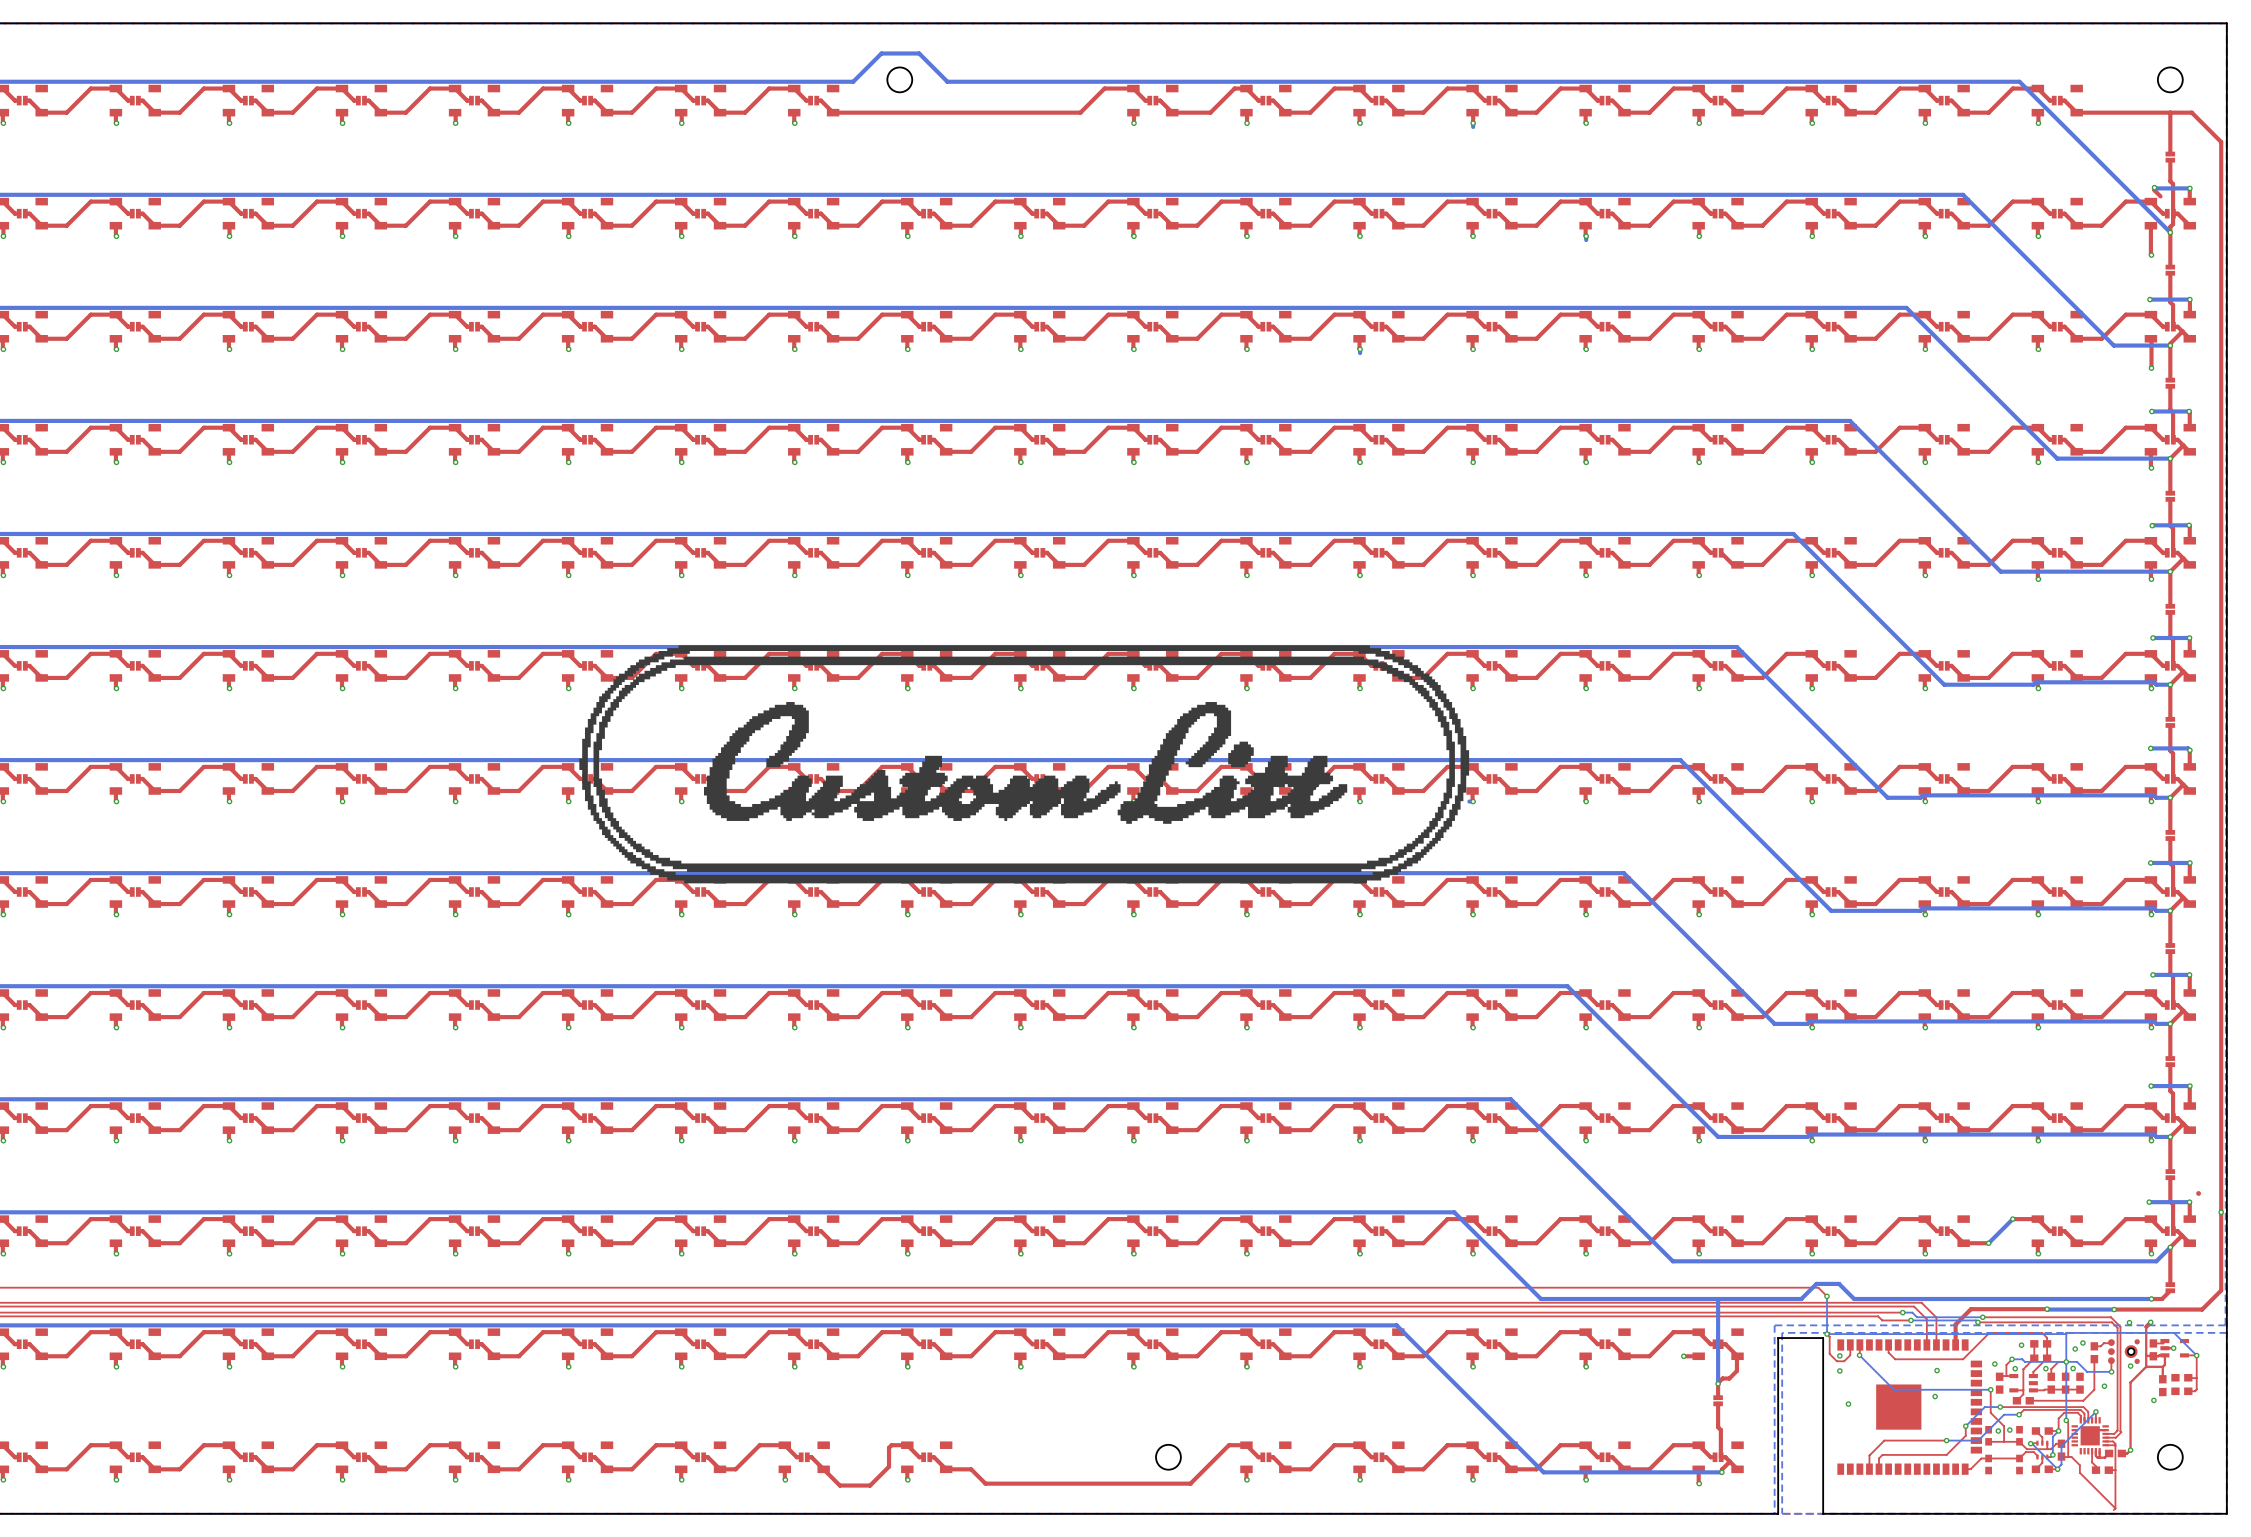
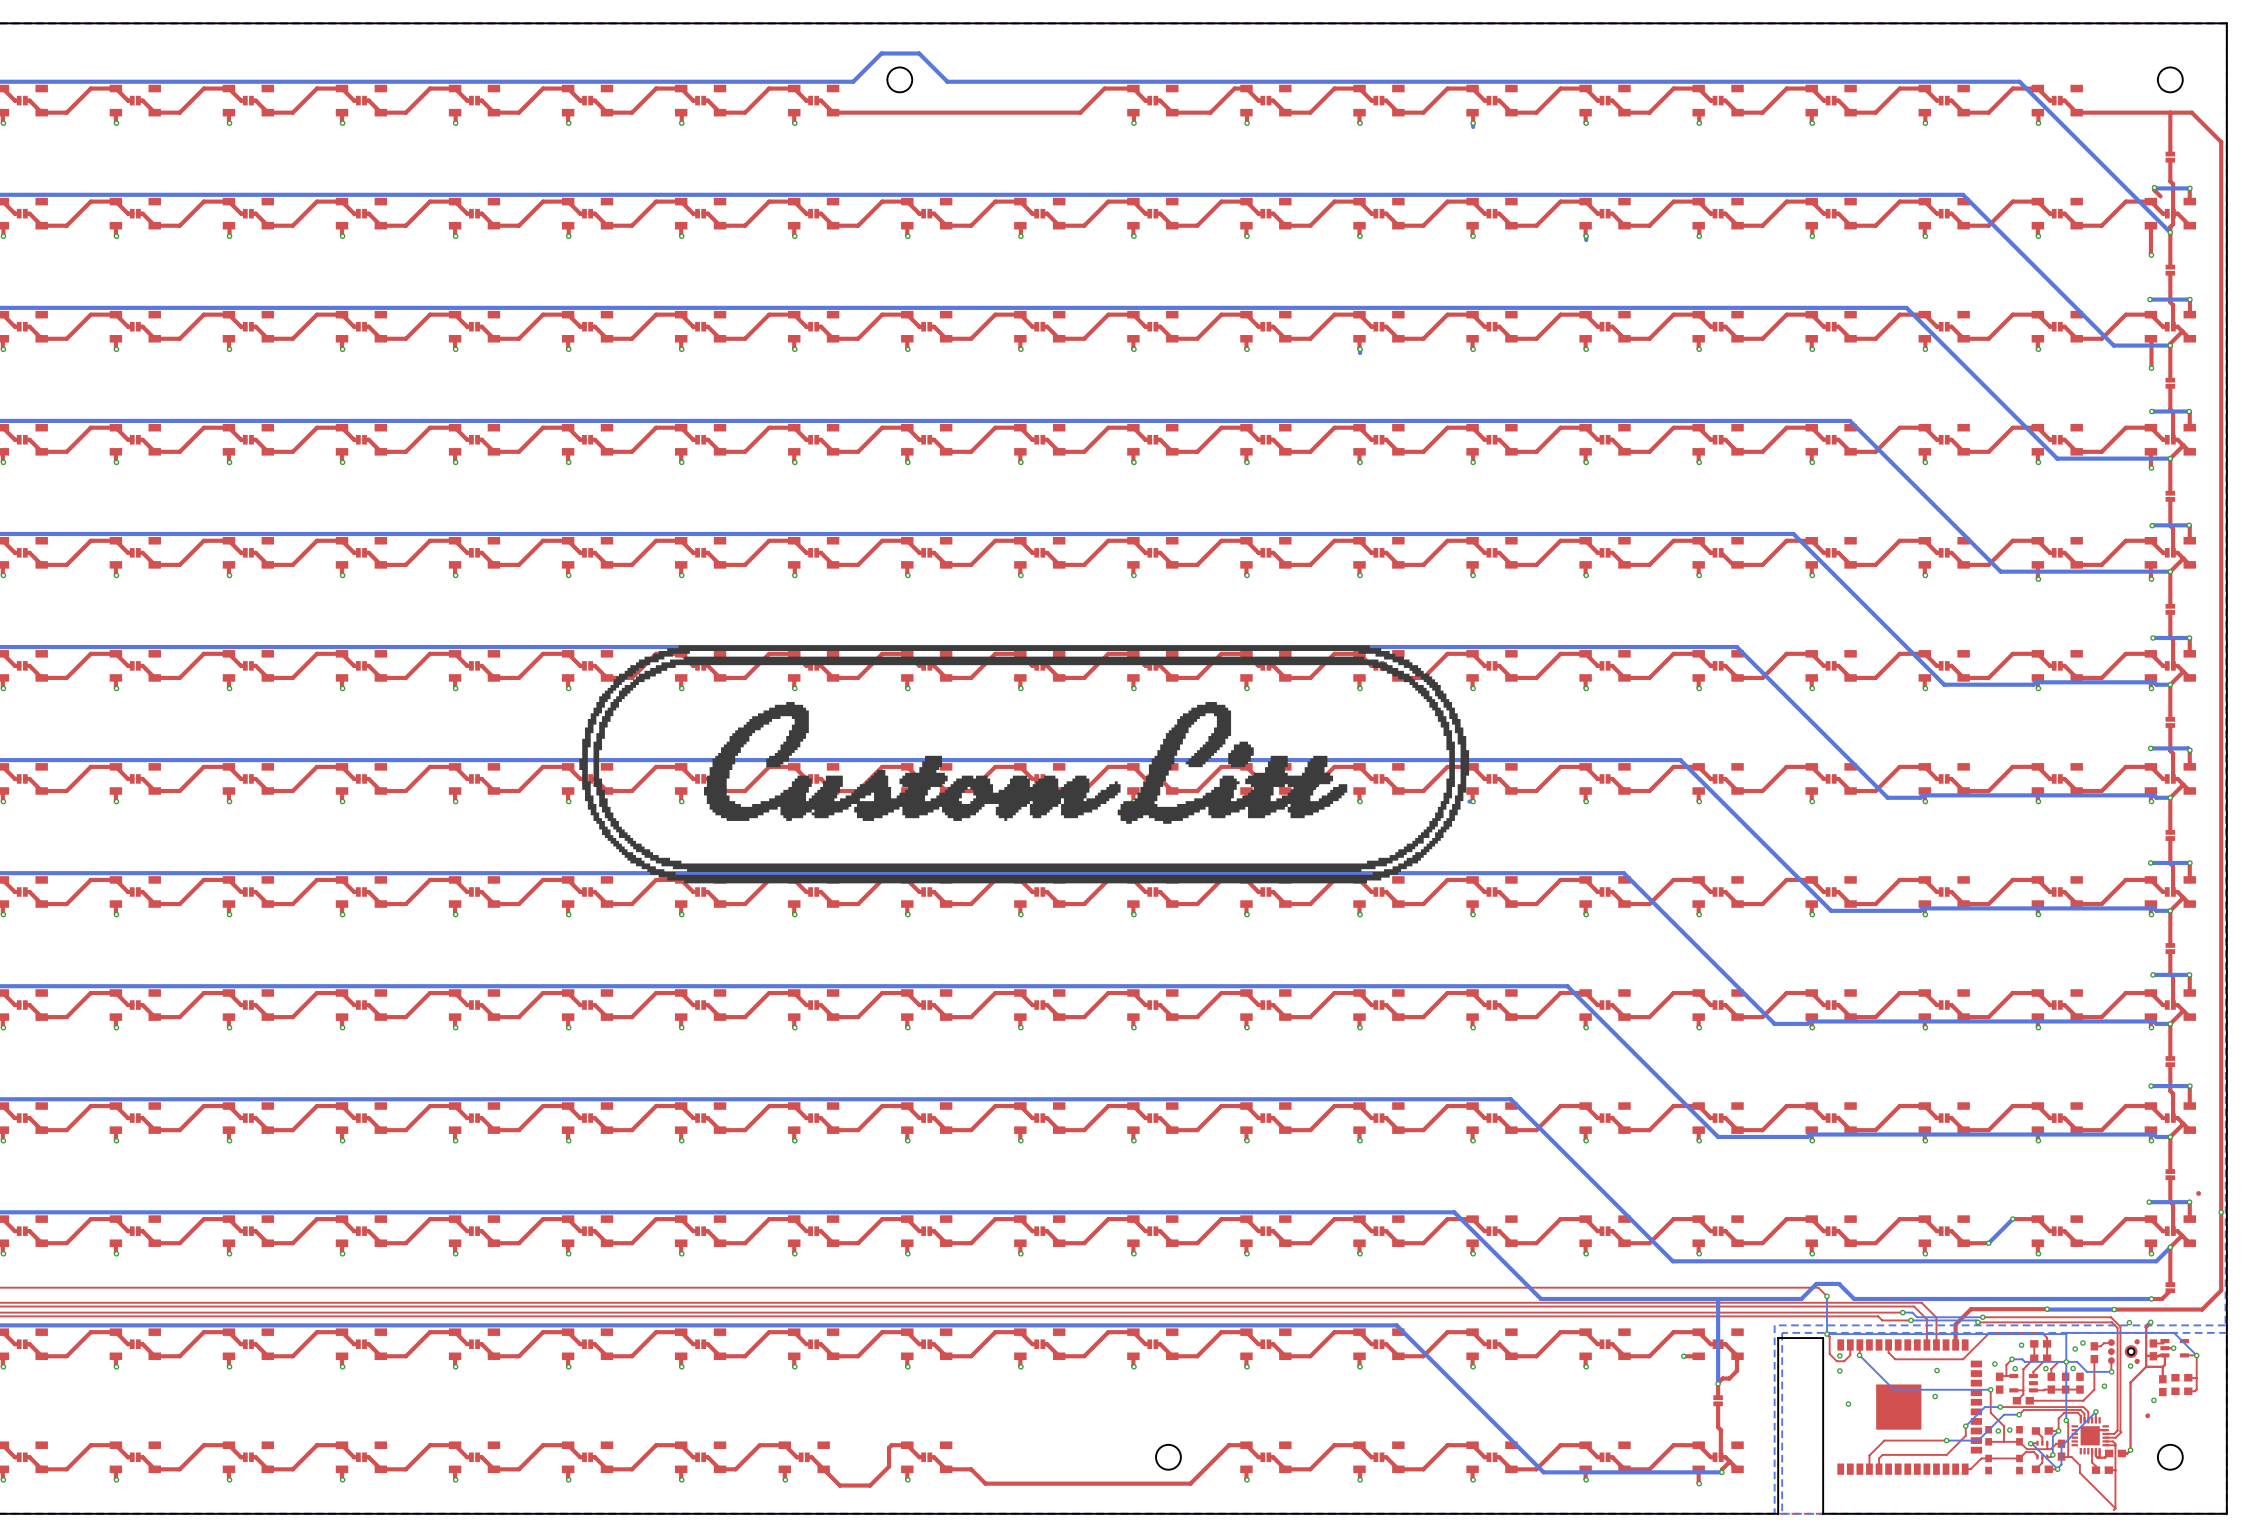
part: none -> (2147, 1415)

